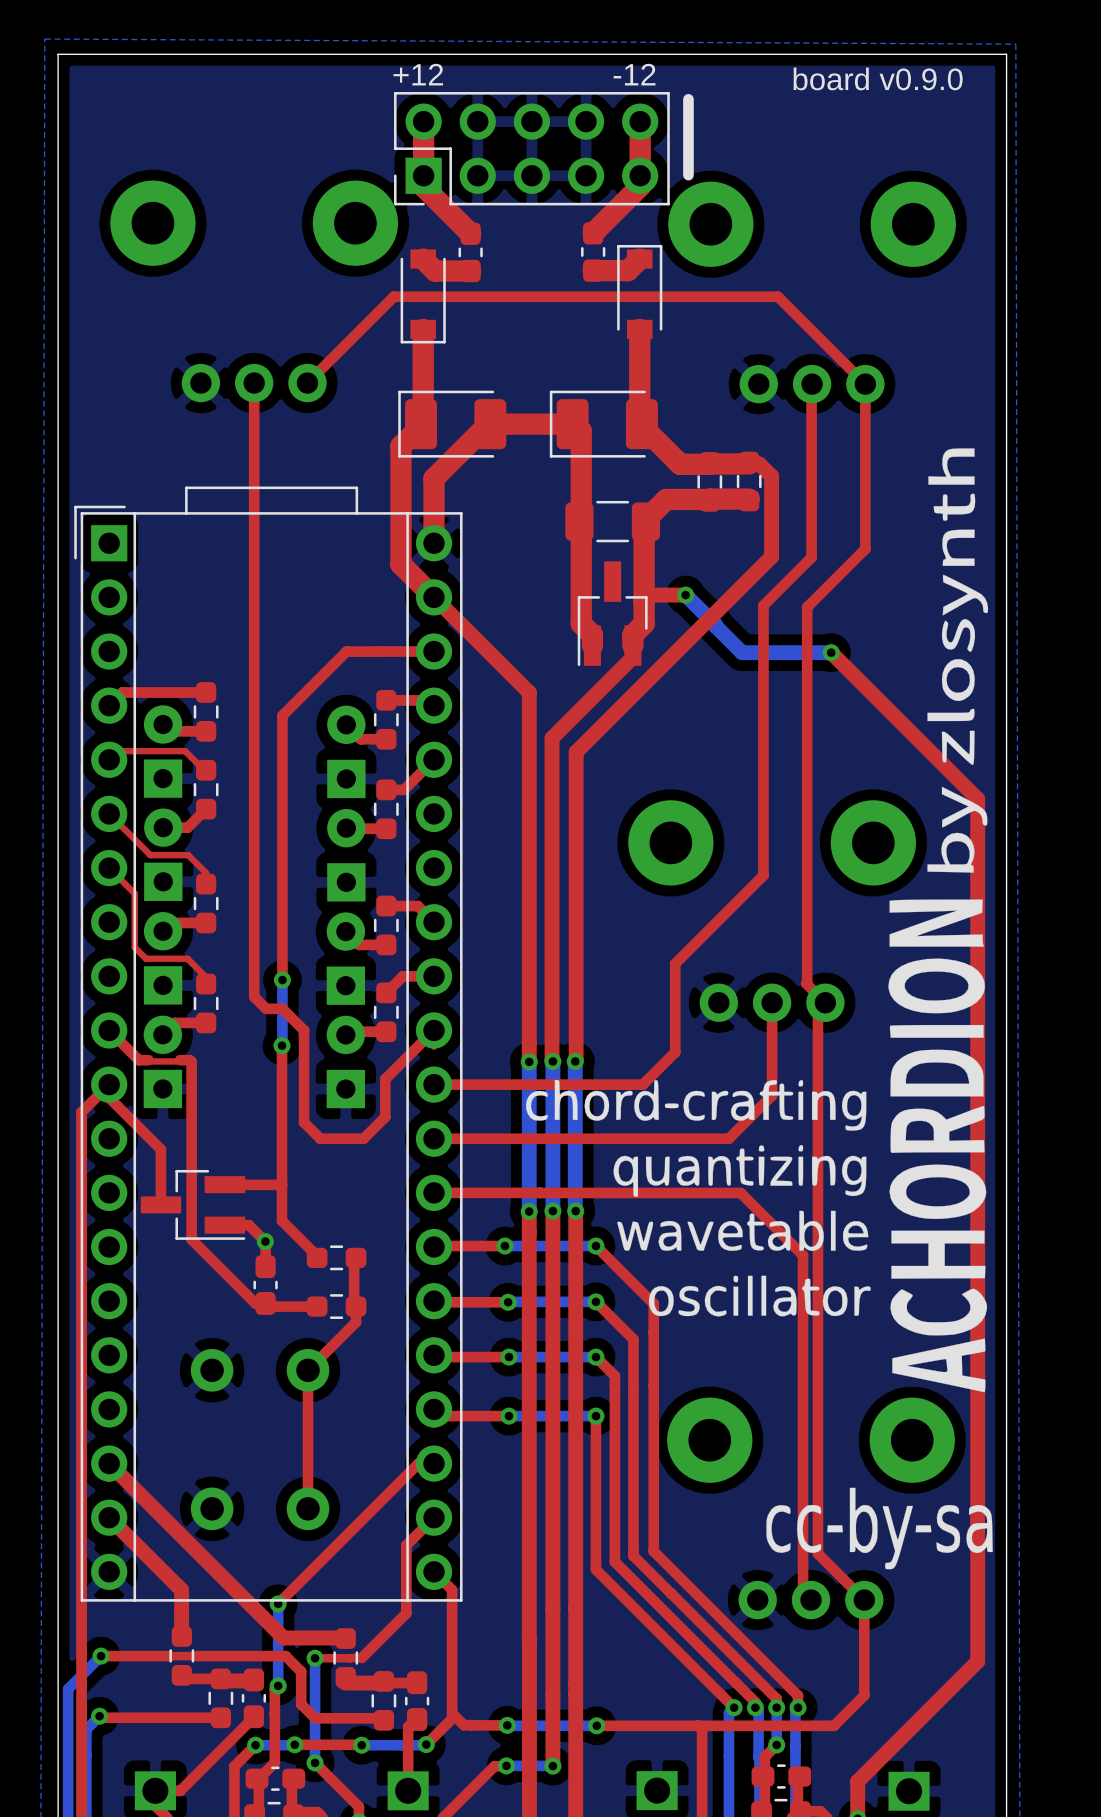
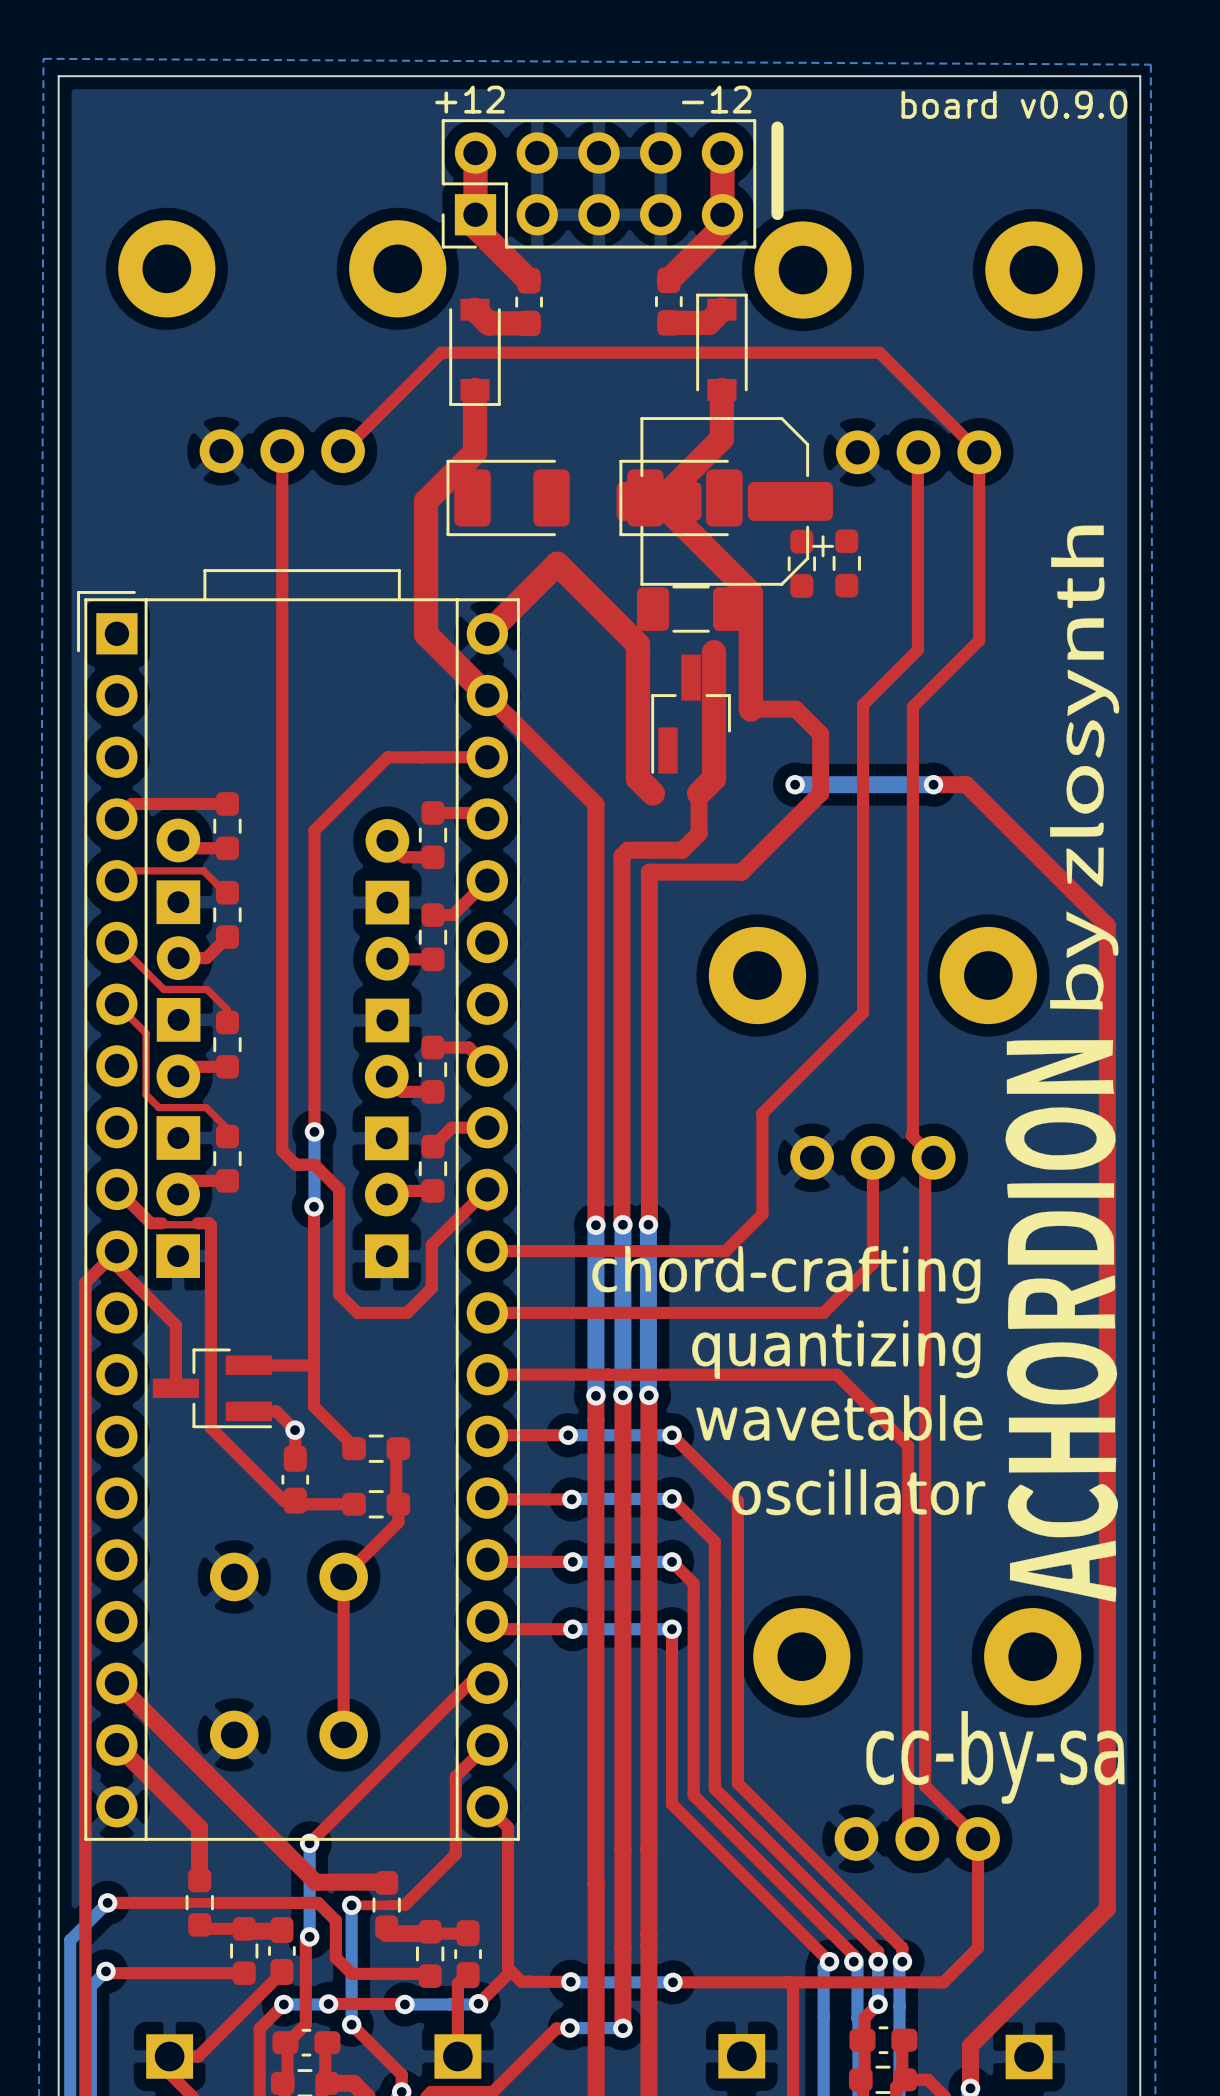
top track: (639, 372) (639, 423) (680, 464) (759, 463) (771, 476) (771, 556) (576, 752) -> (721, 438) (659, 501) (750, 593) (750, 709) (795, 709) (820, 734) (820, 793) (741, 872) (649, 872)
top track: (423, 384) (423, 423) (400, 446) (400, 564) -> (474, 452) (426, 501) (426, 634) (449, 657)
top track: (574, 424) (488, 424) (434, 478) (434, 543) -> (652, 793) (638, 778) (638, 644) (557, 563) (487, 633)
part: none -> (725, 501)
top track: (581, 430) (581, 623) (592, 634) (592, 645) -> none
top track: (749, 499) (666, 499) (644, 521) (644, 623) (632, 637) -> none
top track: (685, 595) (650, 595) (644, 601) -> none
bottom track: (685, 595) (742, 652) (831, 652) -> none
via: (685, 595) -> none
top track: (632, 645) (632, 657) (557, 733) -> (714, 750) (713, 778) (699, 793) (699, 833) (682, 850) (627, 850)
top track: (831, 652) (854, 675) -> (933, 784) (966, 784)
via position: (831, 652) -> (933, 784)
bottom track: none -> (795, 784) (933, 784)
via: none -> (795, 784)

